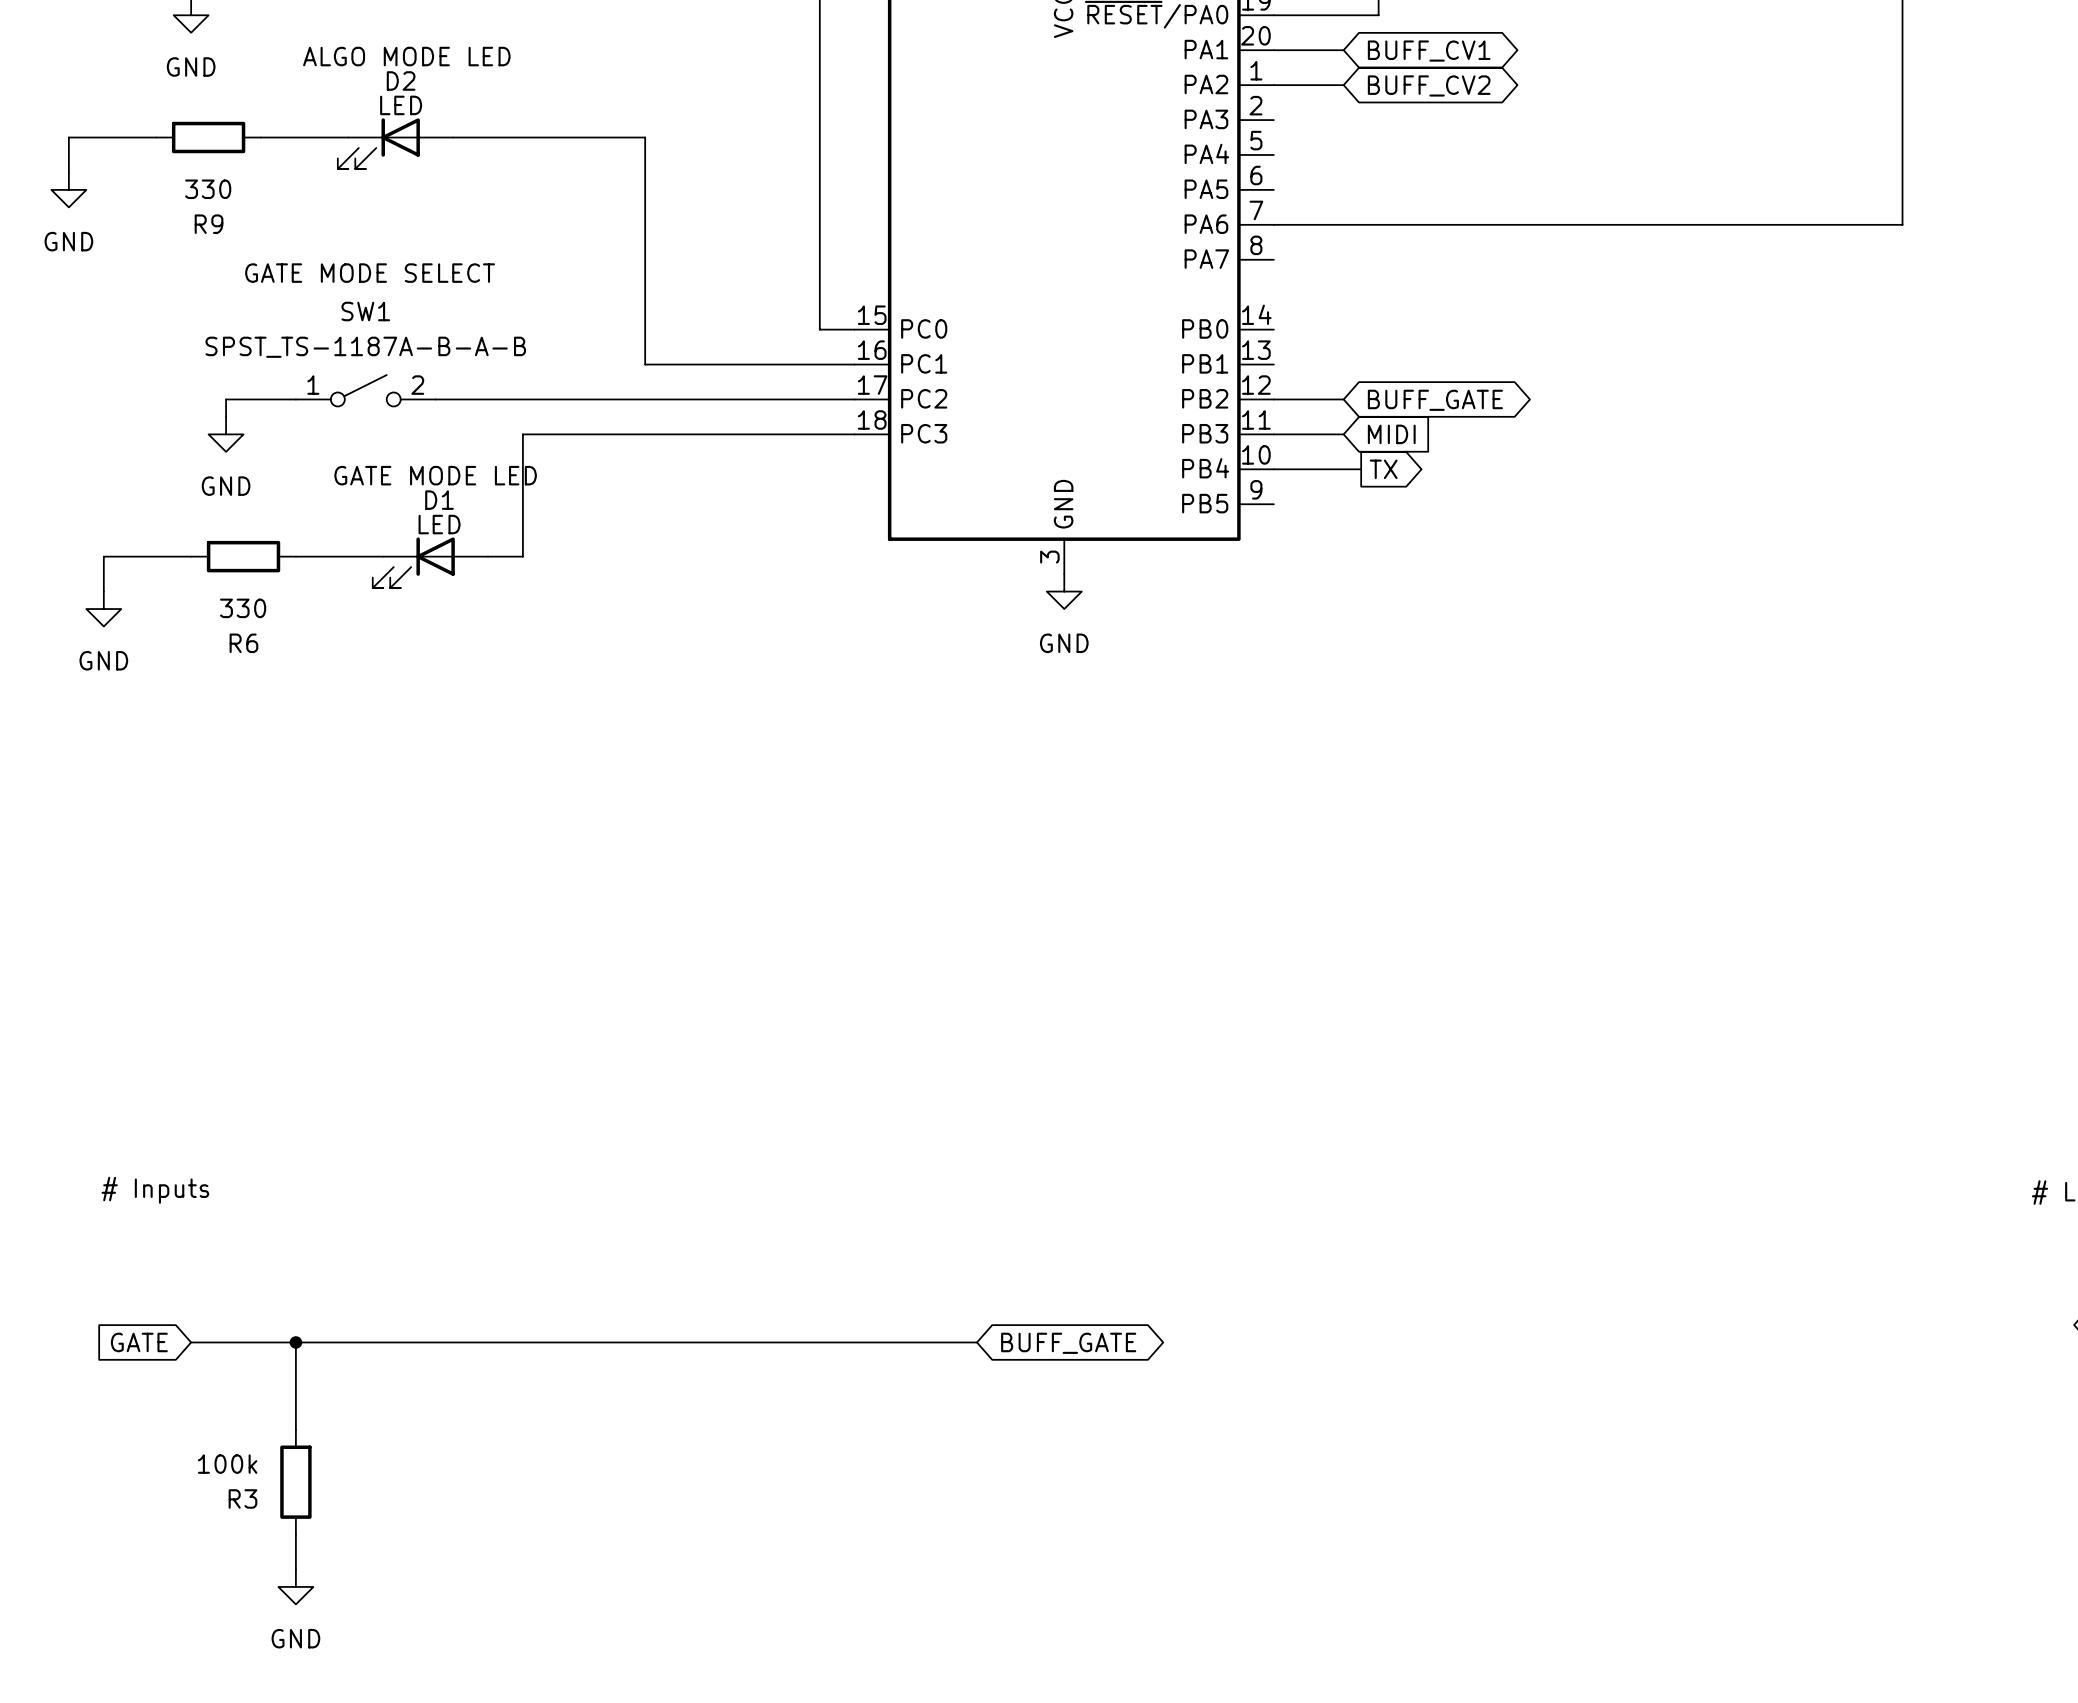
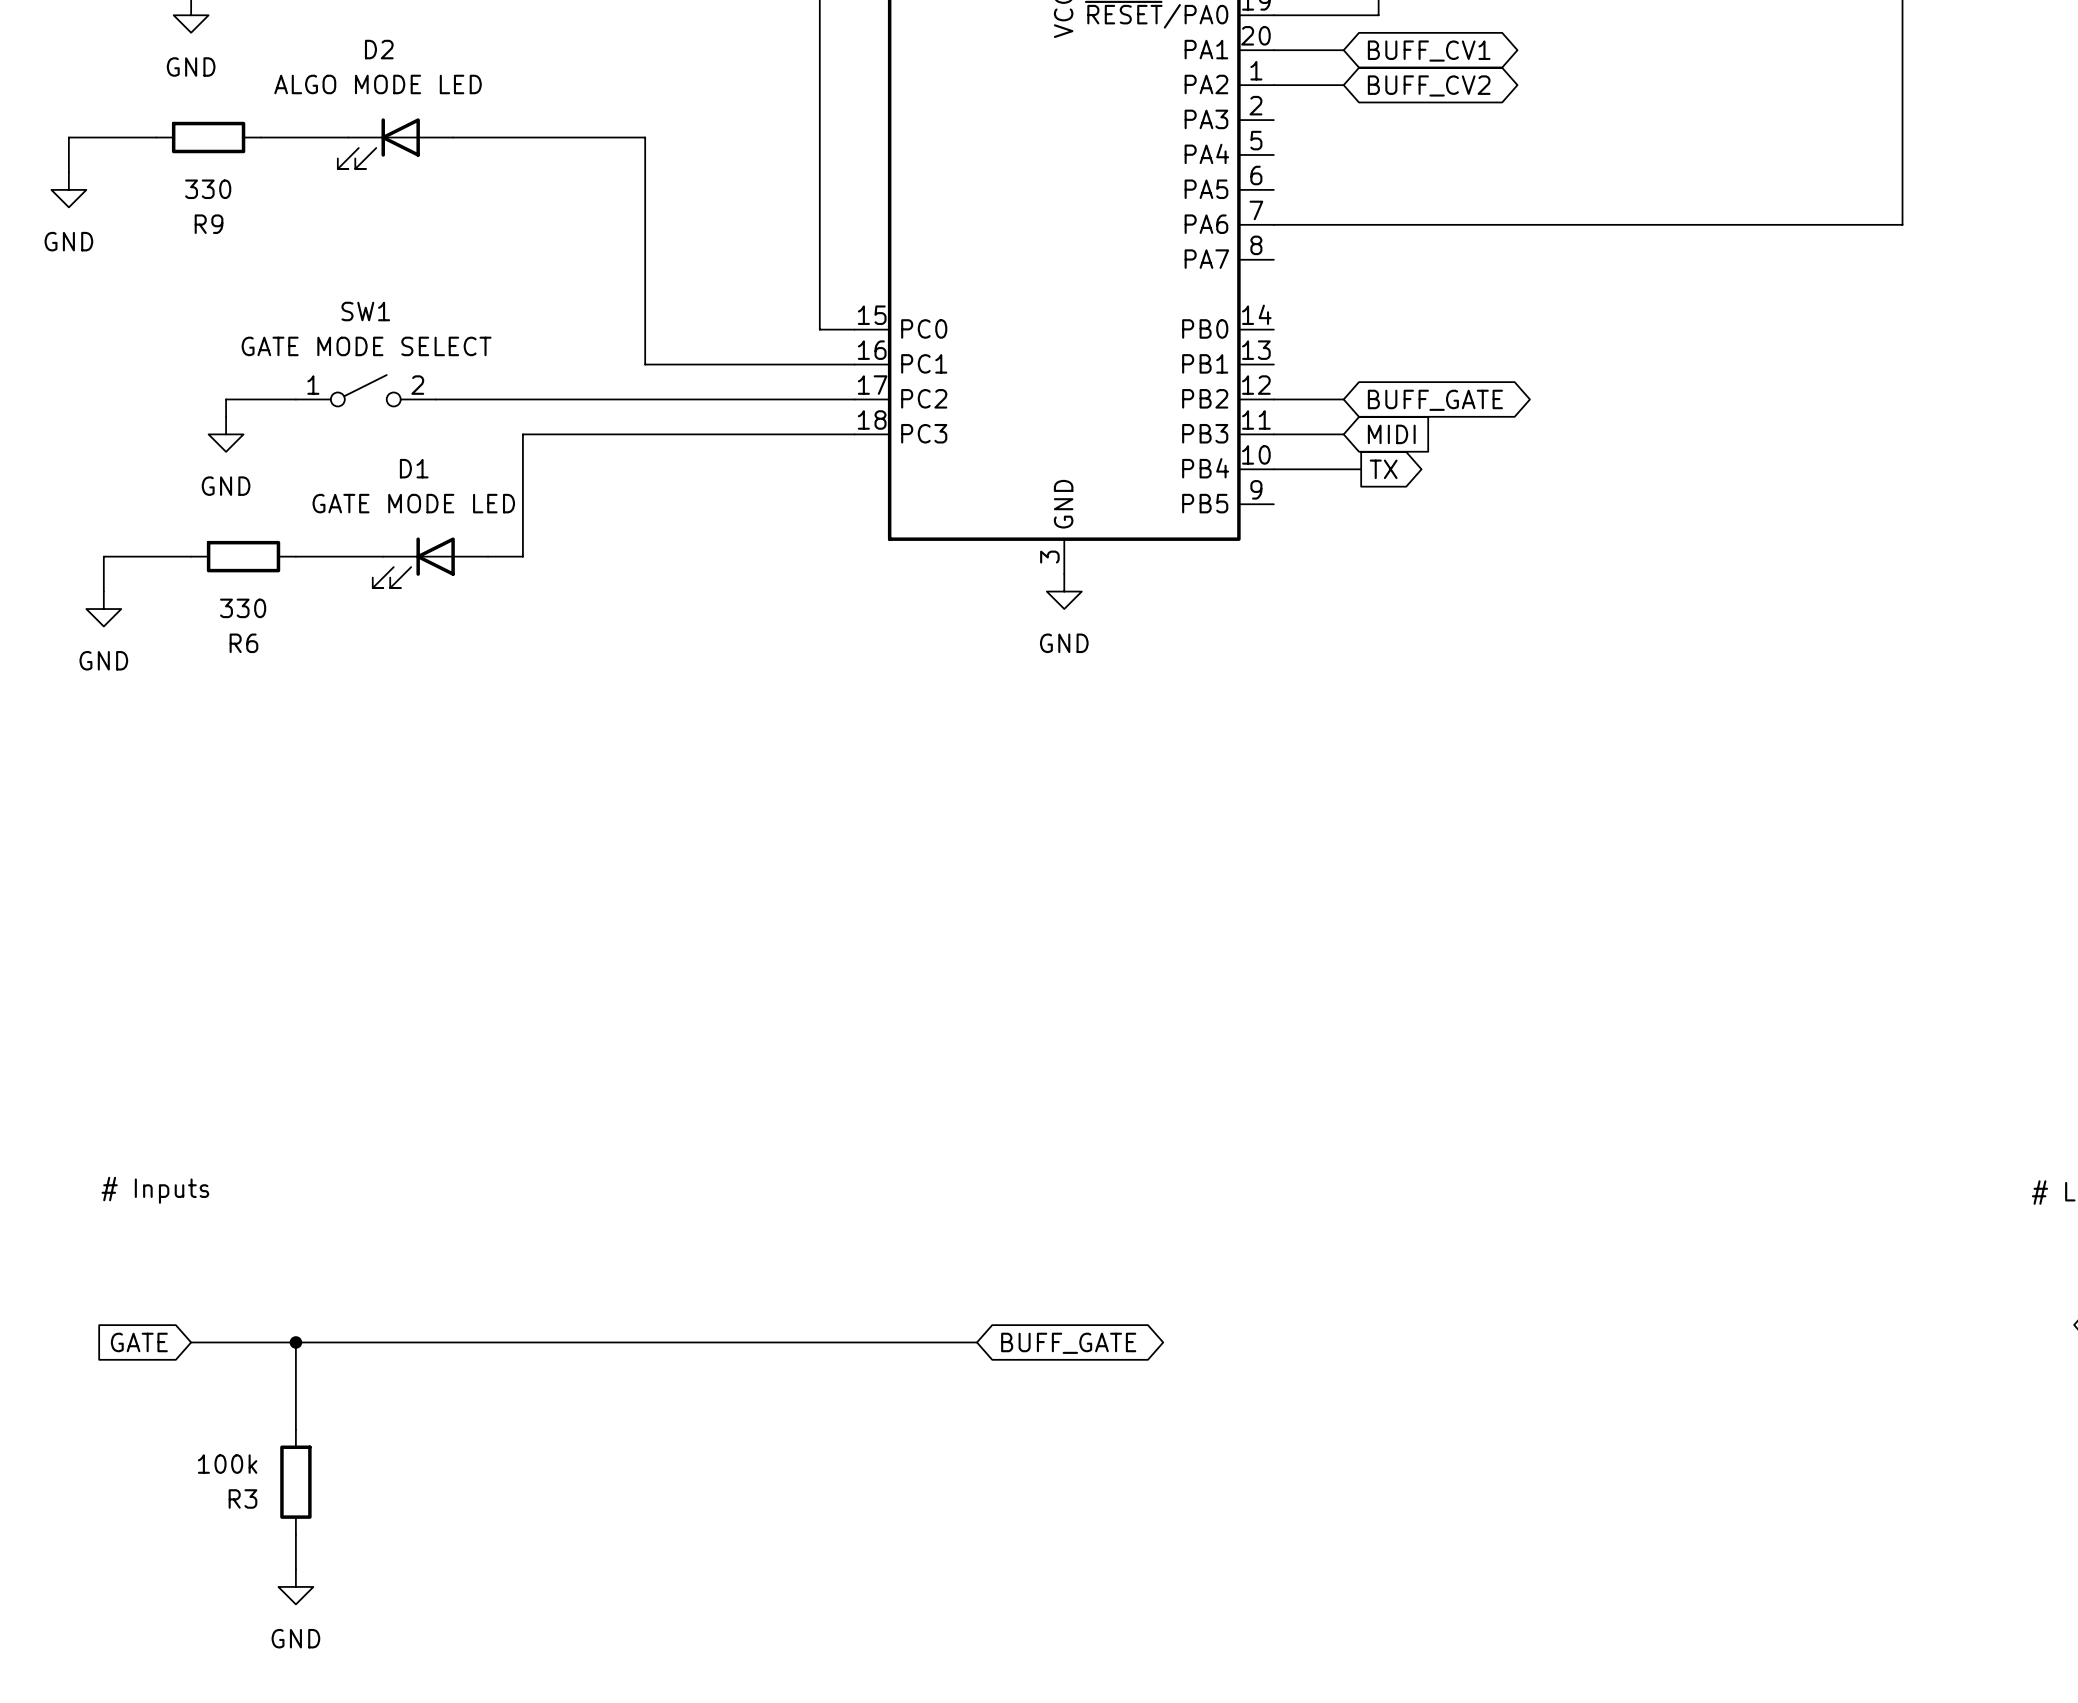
D2 text: ALGO MODE LED (406, 56) -> none
D2 name position: D2 (401, 80) -> D2 (379, 49)
D2 value: LED (401, 105) -> ALGO MODE LED (378, 84)
SW1 text: GATE MODE SELECT (370, 273) -> none
SW1 value: SPST_TS-1187A-B-A-B (365, 347) -> GATE MODE SELECT (366, 346)
D1 text: GATE MODE LED (435, 475) -> none
D1 name position: D1 (439, 500) -> D1 (414, 468)
D1 value: LED (439, 524) -> GATE MODE LED (413, 503)

